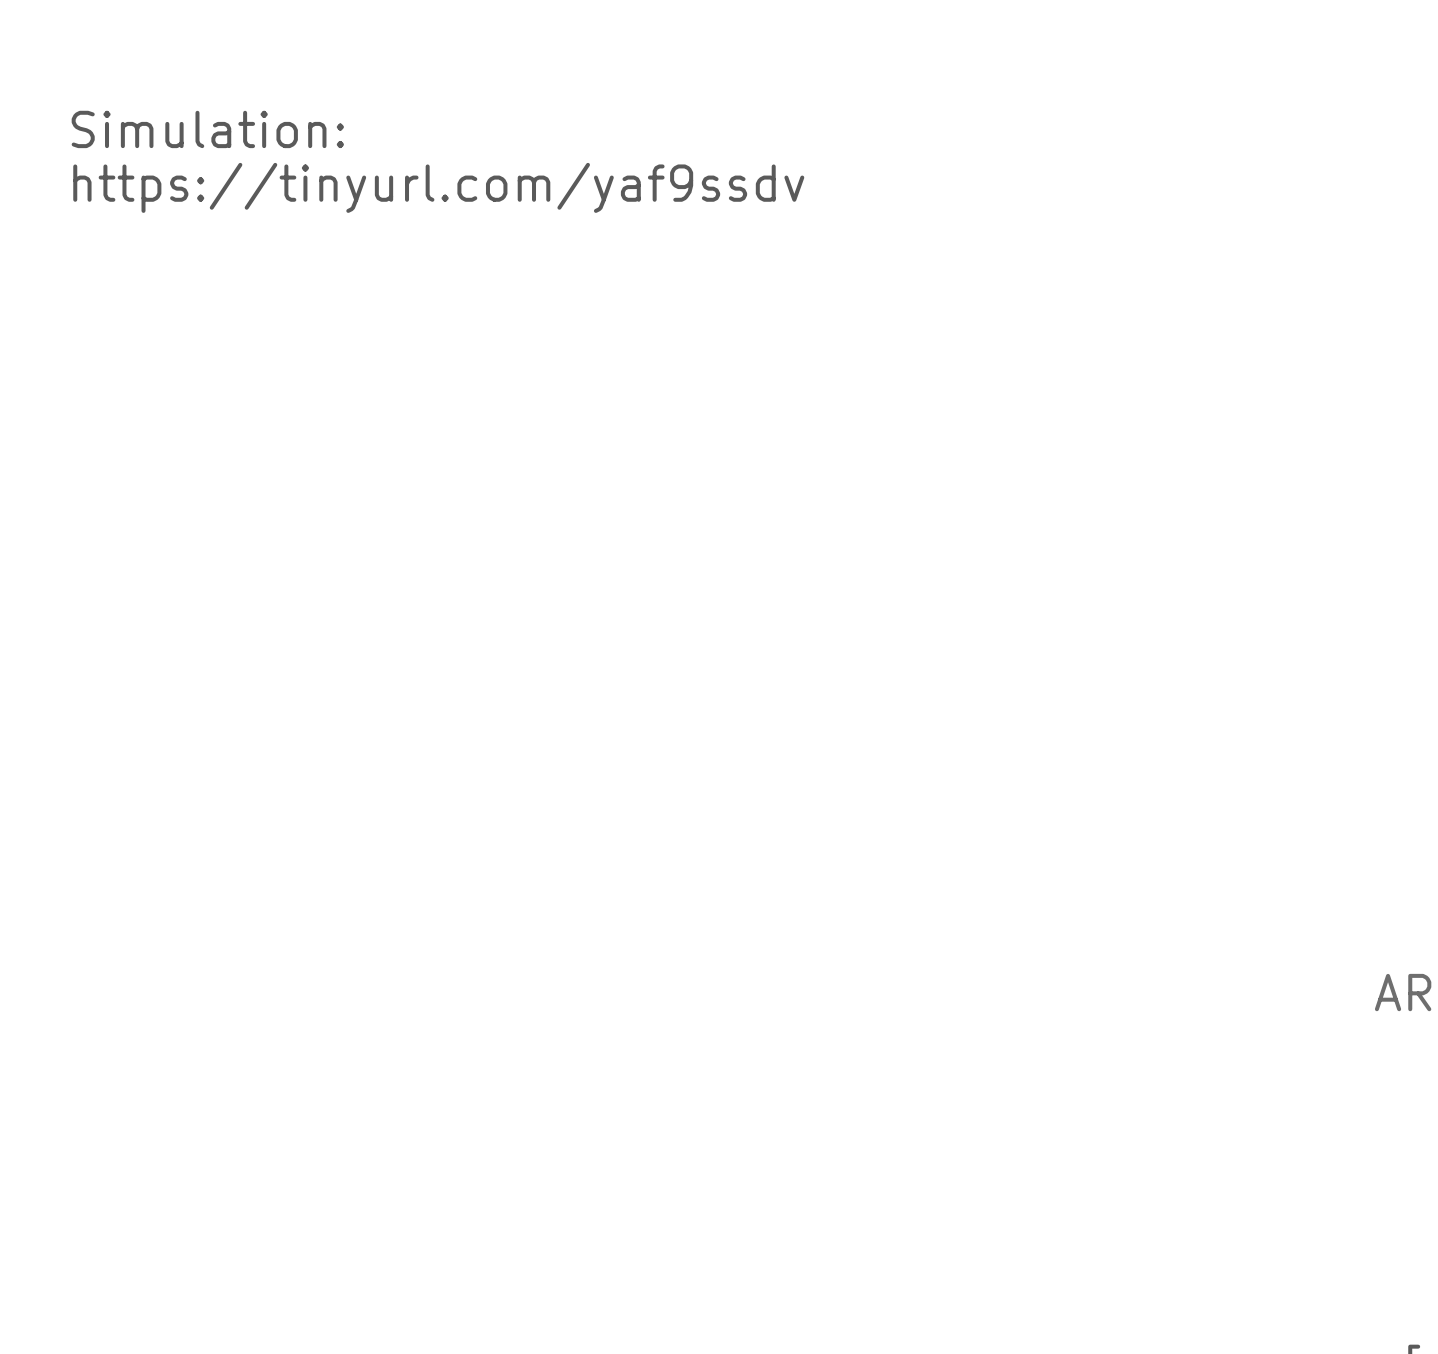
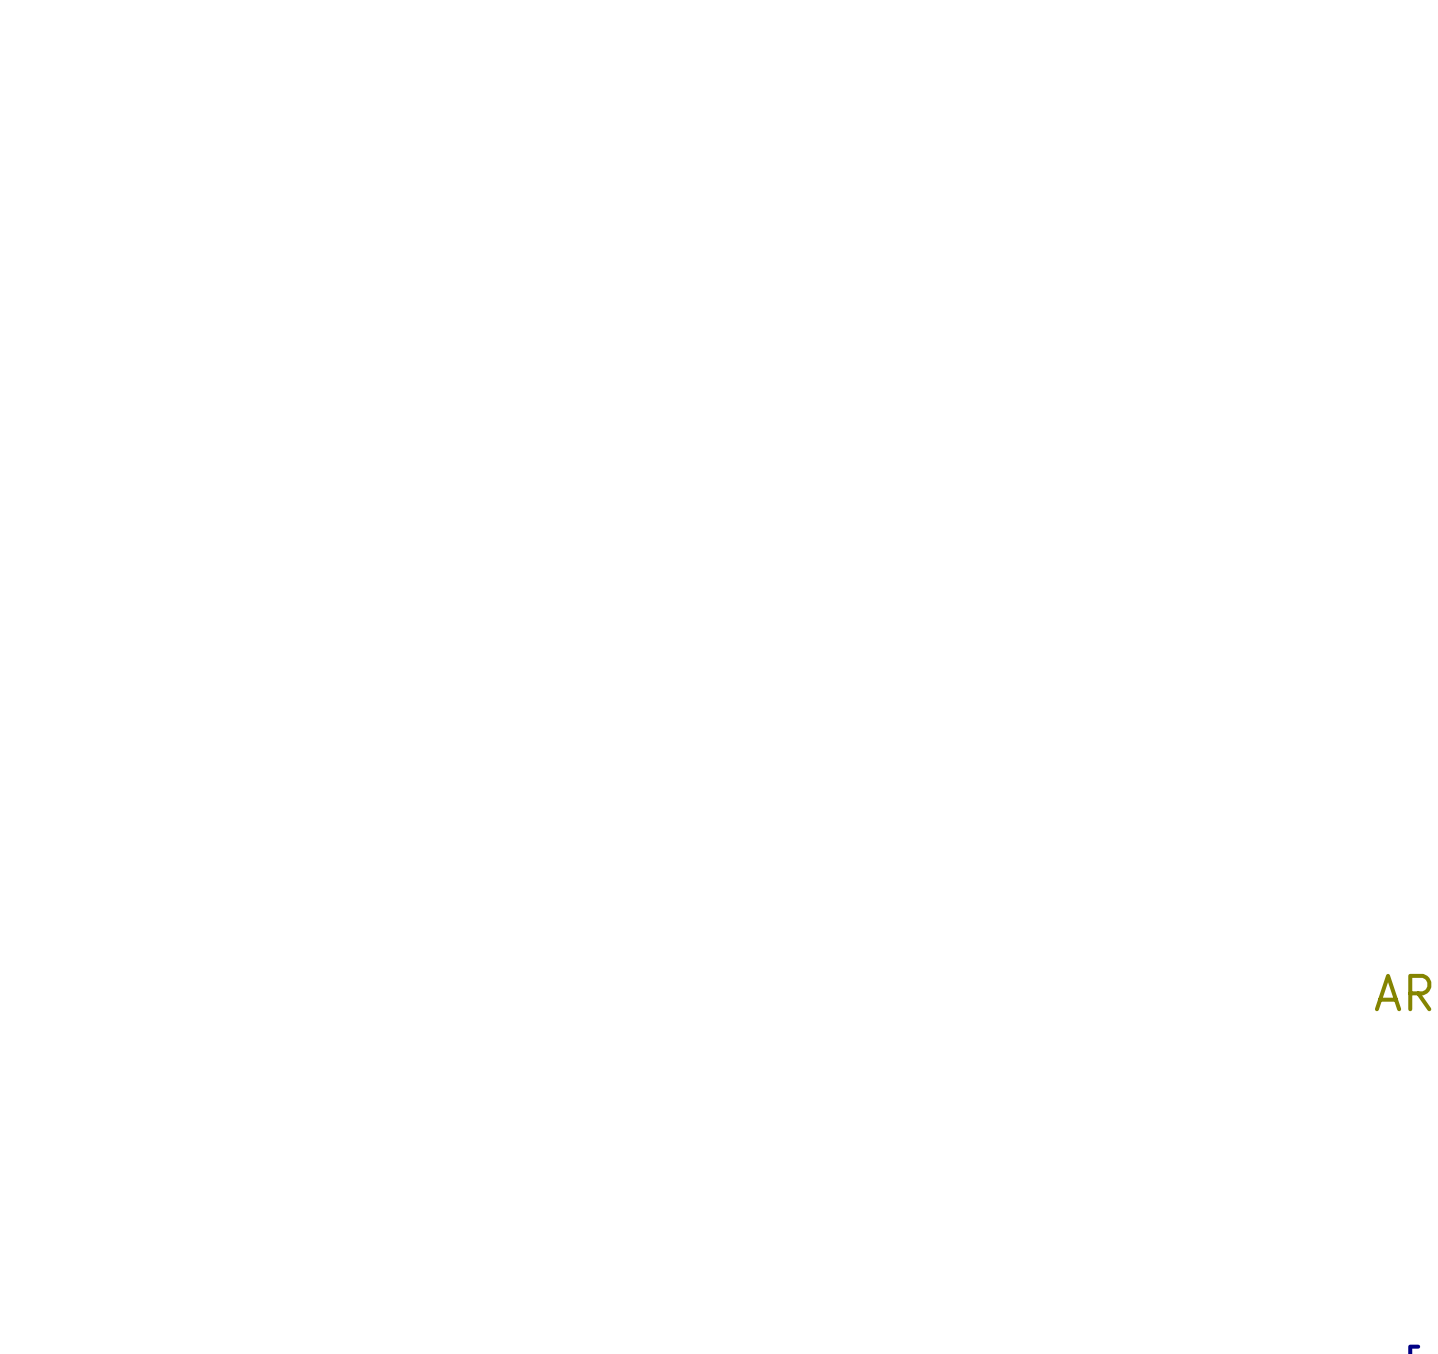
text: Simulation: (207, 129) -> none
text: https://tinyurl.com/yaf9ssdv (438, 187) -> none

